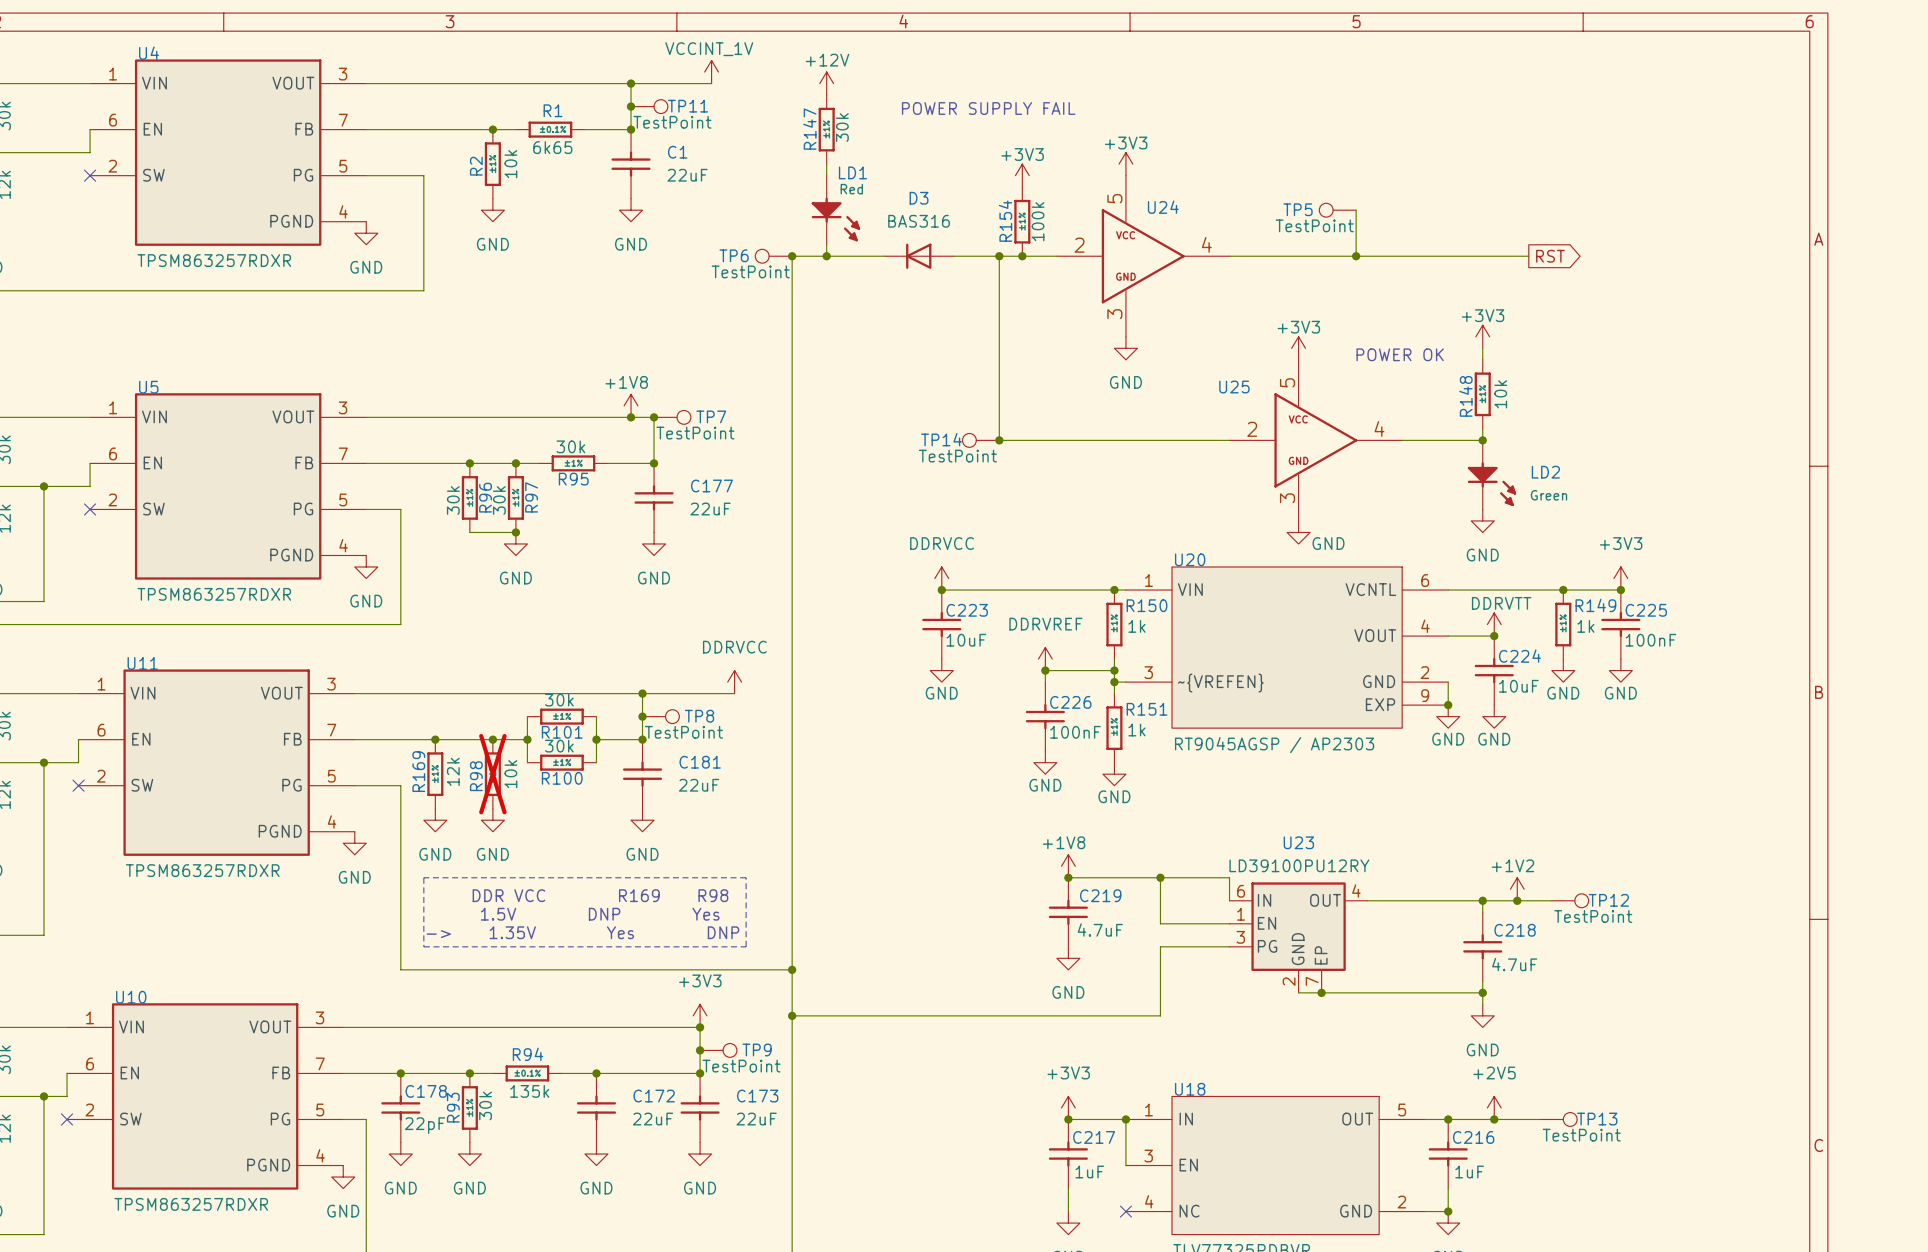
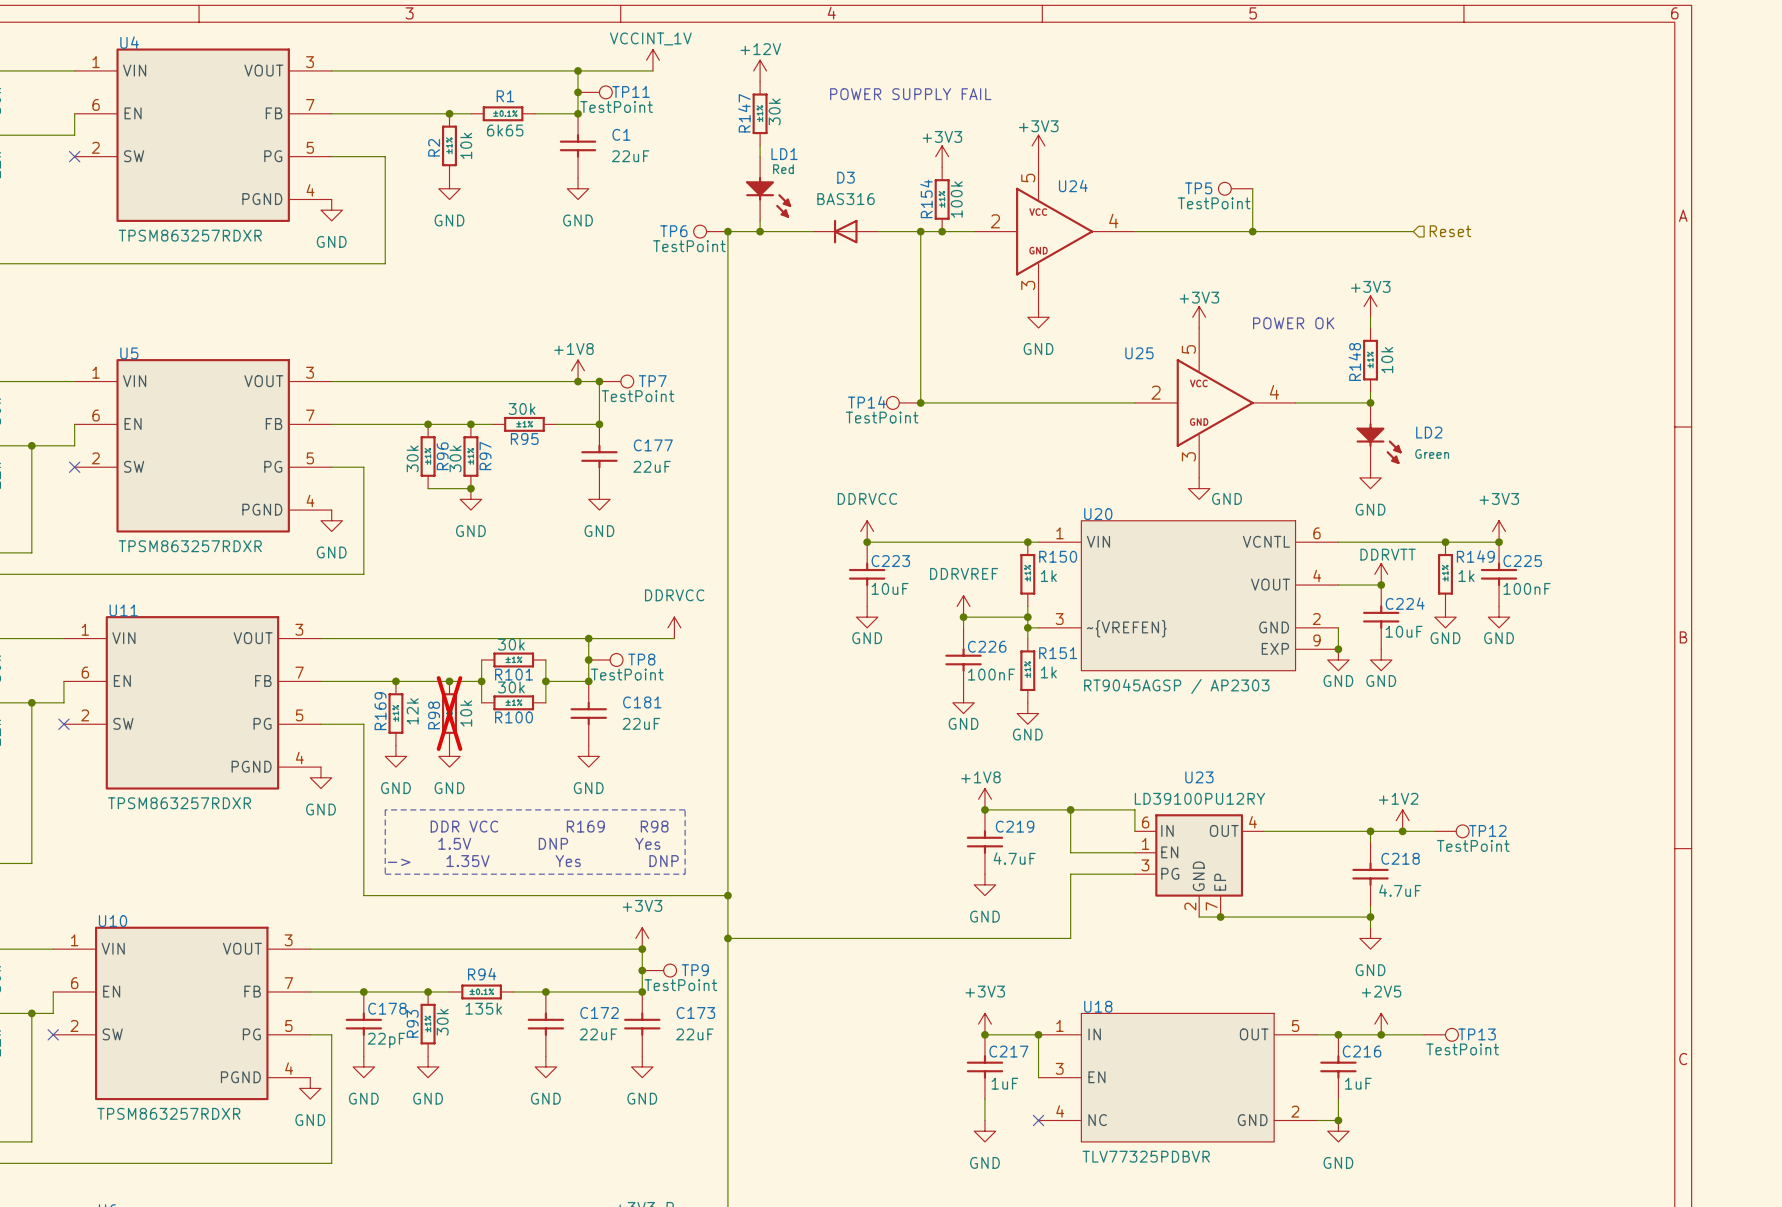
hierarchical label: none -> Reset (1450, 231)
global label: RST (1550, 256) -> none

